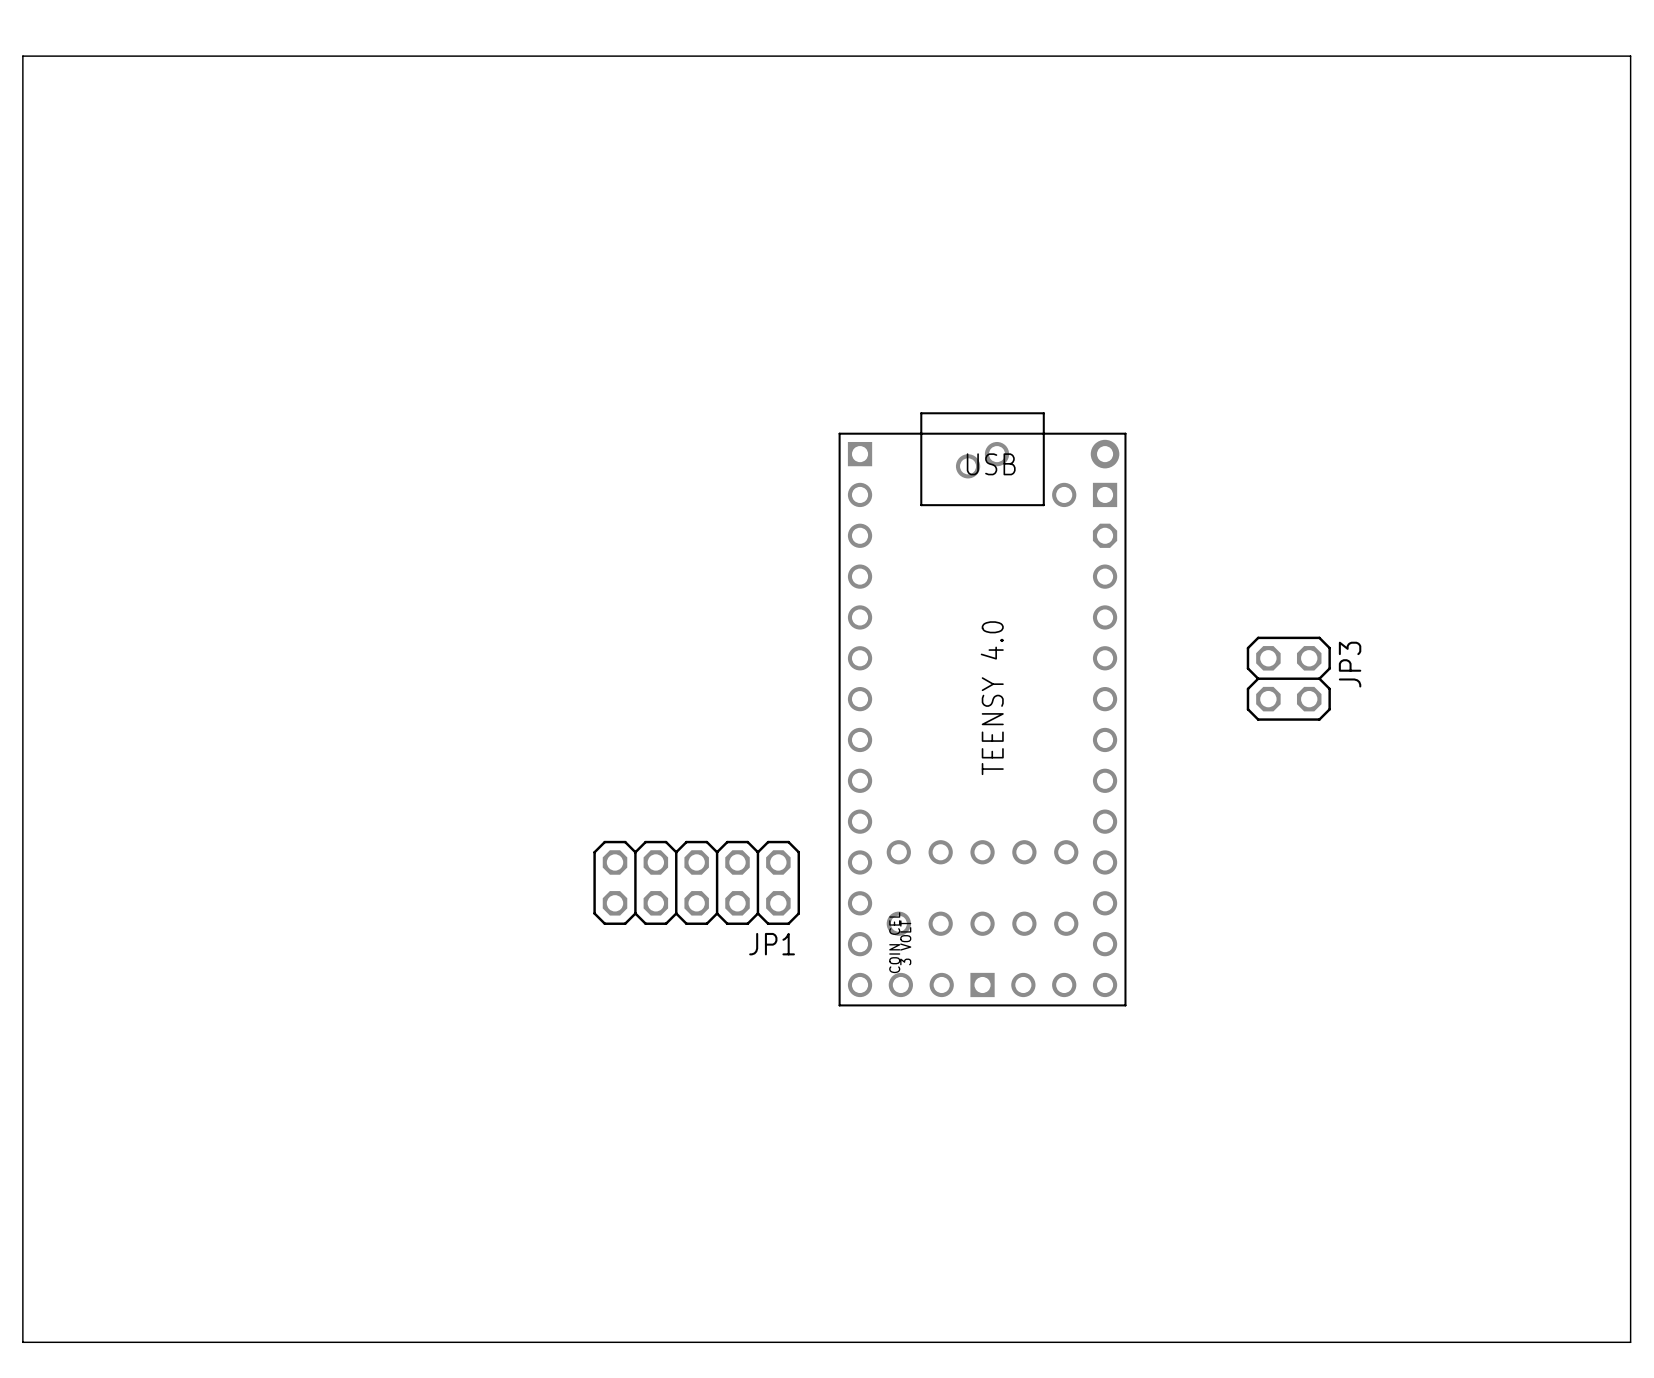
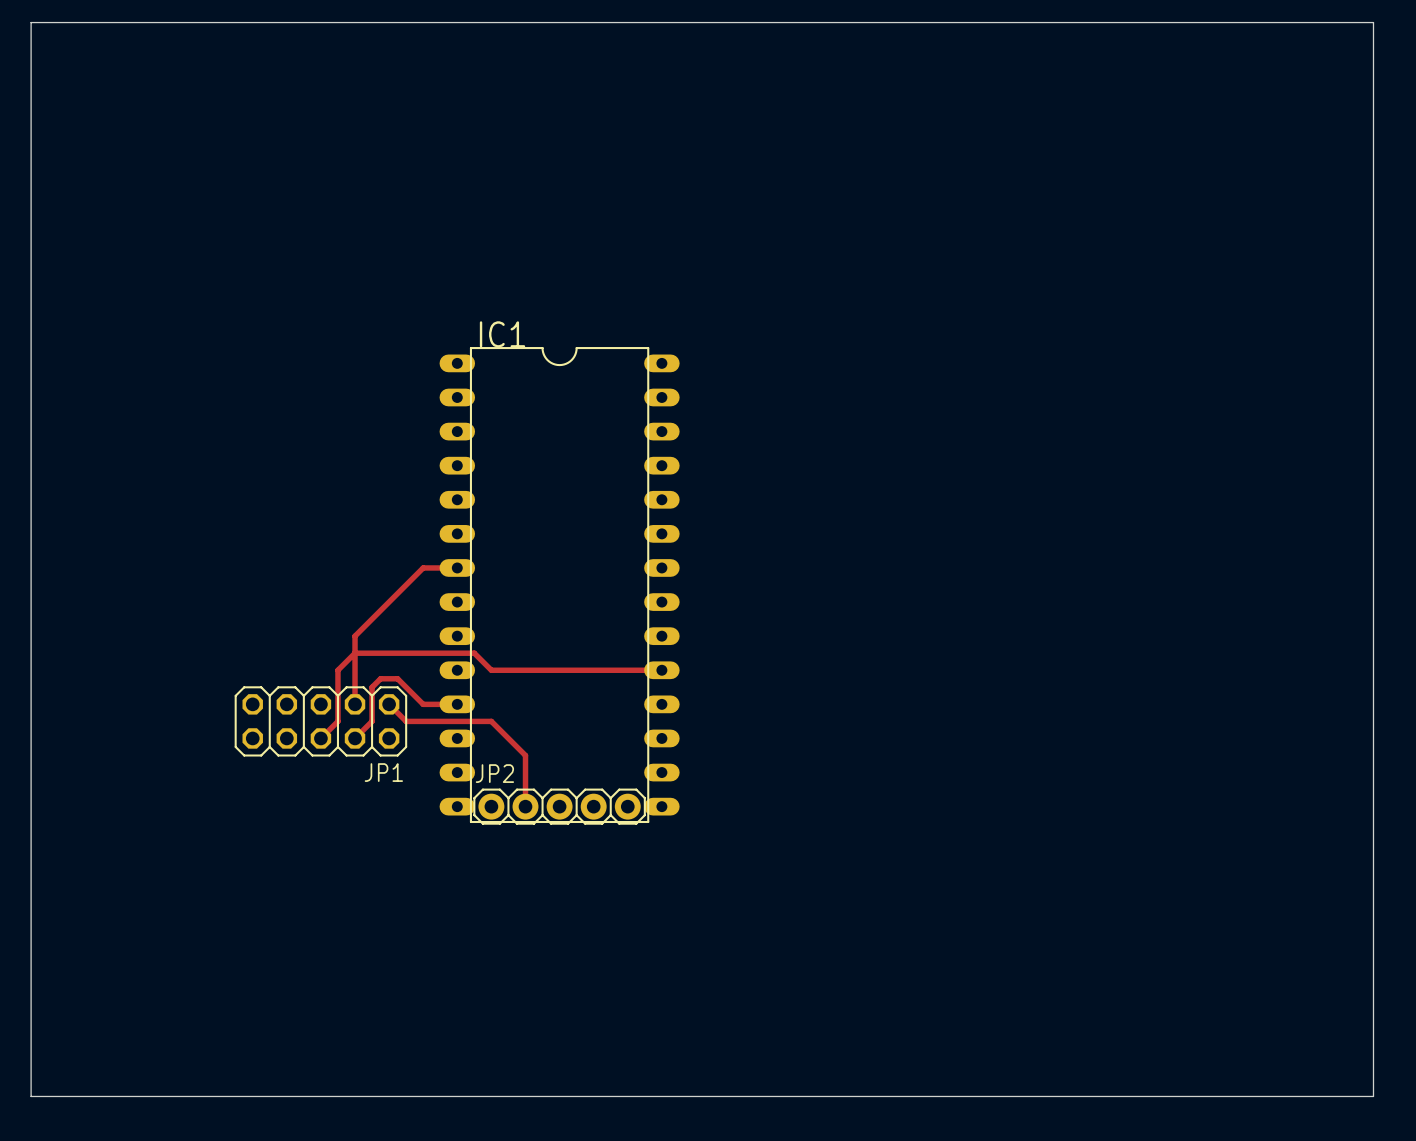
JP3: (1288, 678) -> none
track: none -> (457, 567) (423, 567) (355, 636) (355, 704)
part: (982, 709) -> none
IC1: none -> (559, 585)
track: none -> (661, 670) (491, 670) (474, 653) (355, 653) (337, 670) (337, 721) (320, 738)
track: none -> (389, 704) (406, 721) (491, 721) (525, 755) (525, 806)
track: none -> (457, 704) (423, 704) (397, 678) (380, 678) (372, 687) (372, 721) (355, 738)
JP1 position: (696, 882) -> (320, 721)
JP2: none -> (559, 806)

